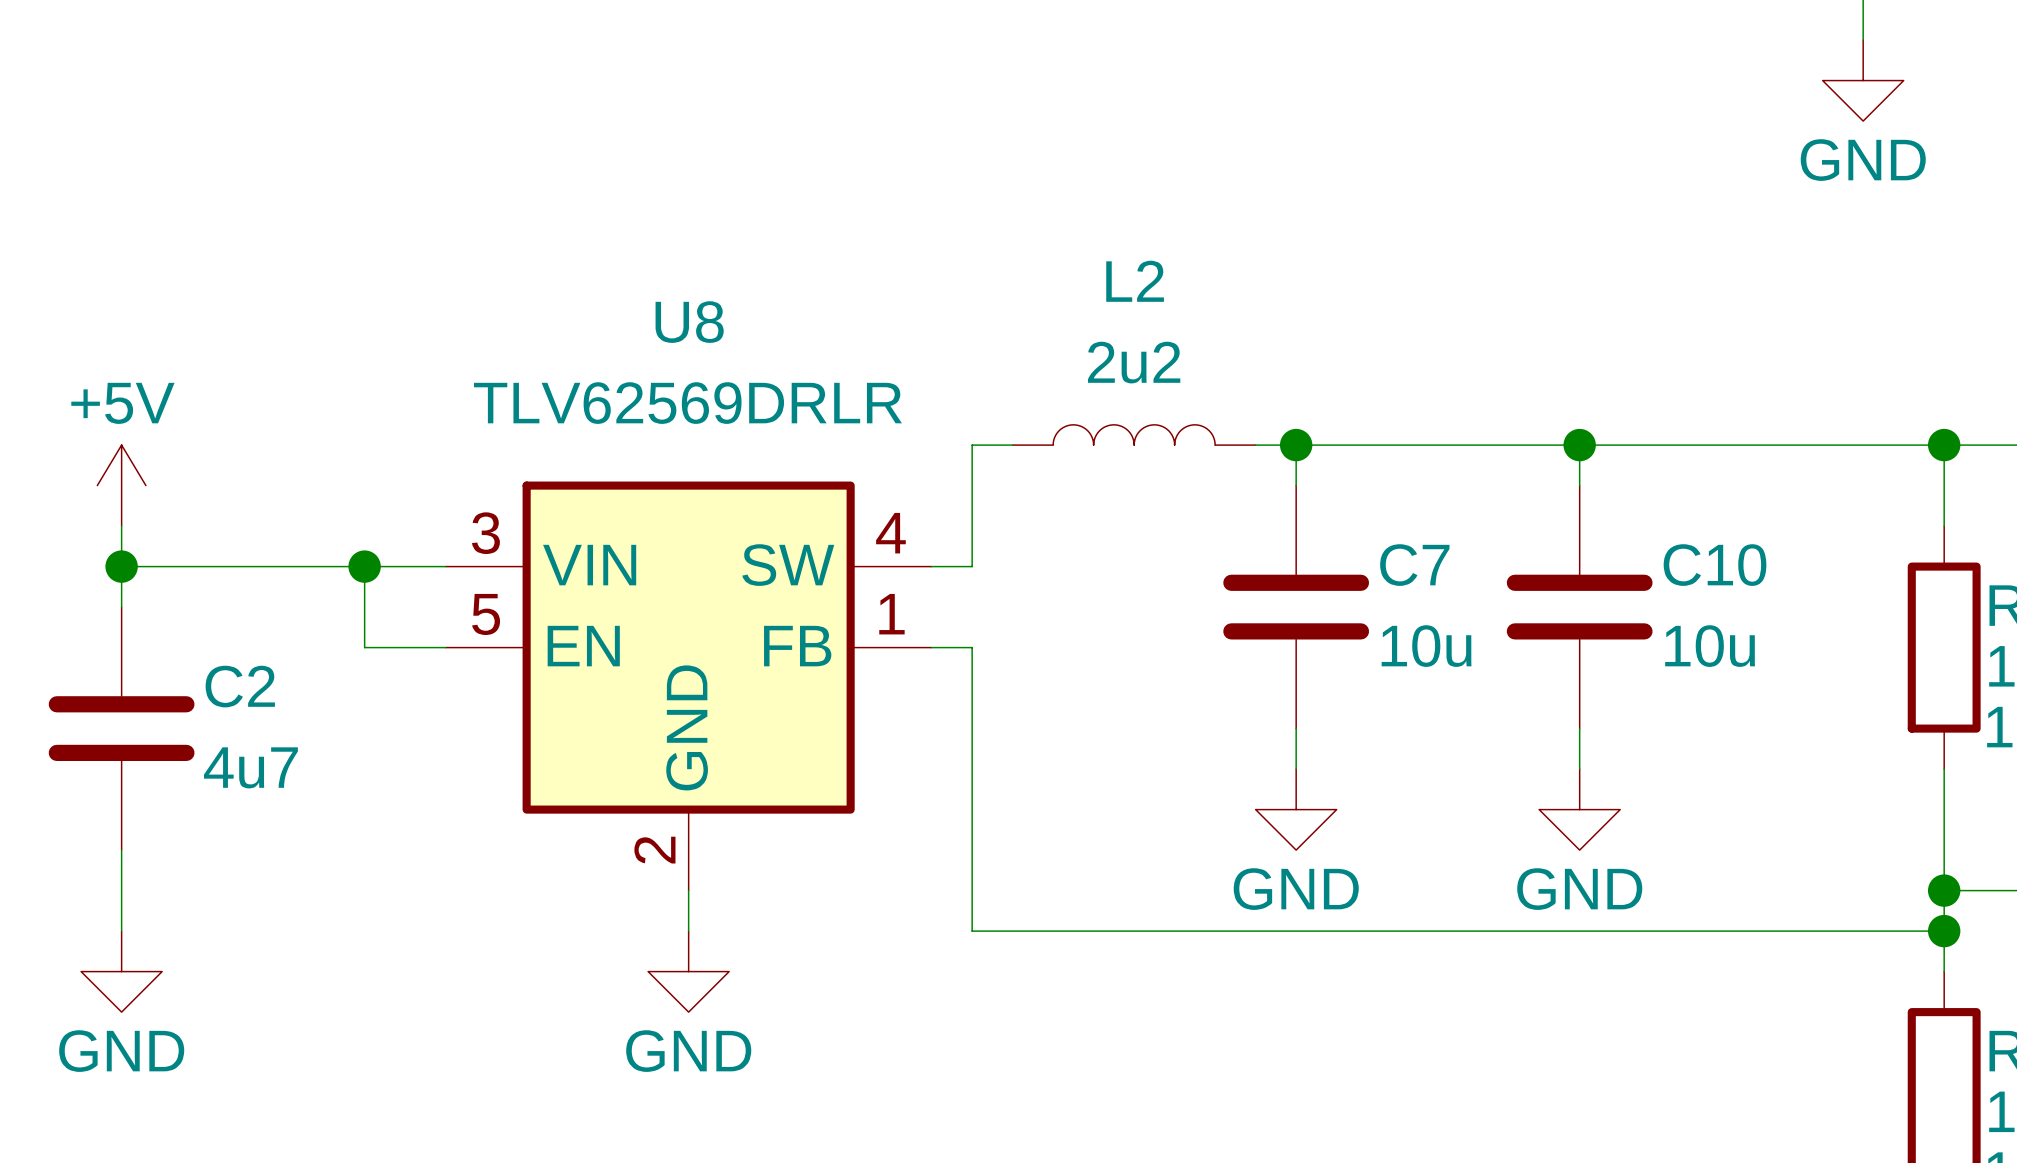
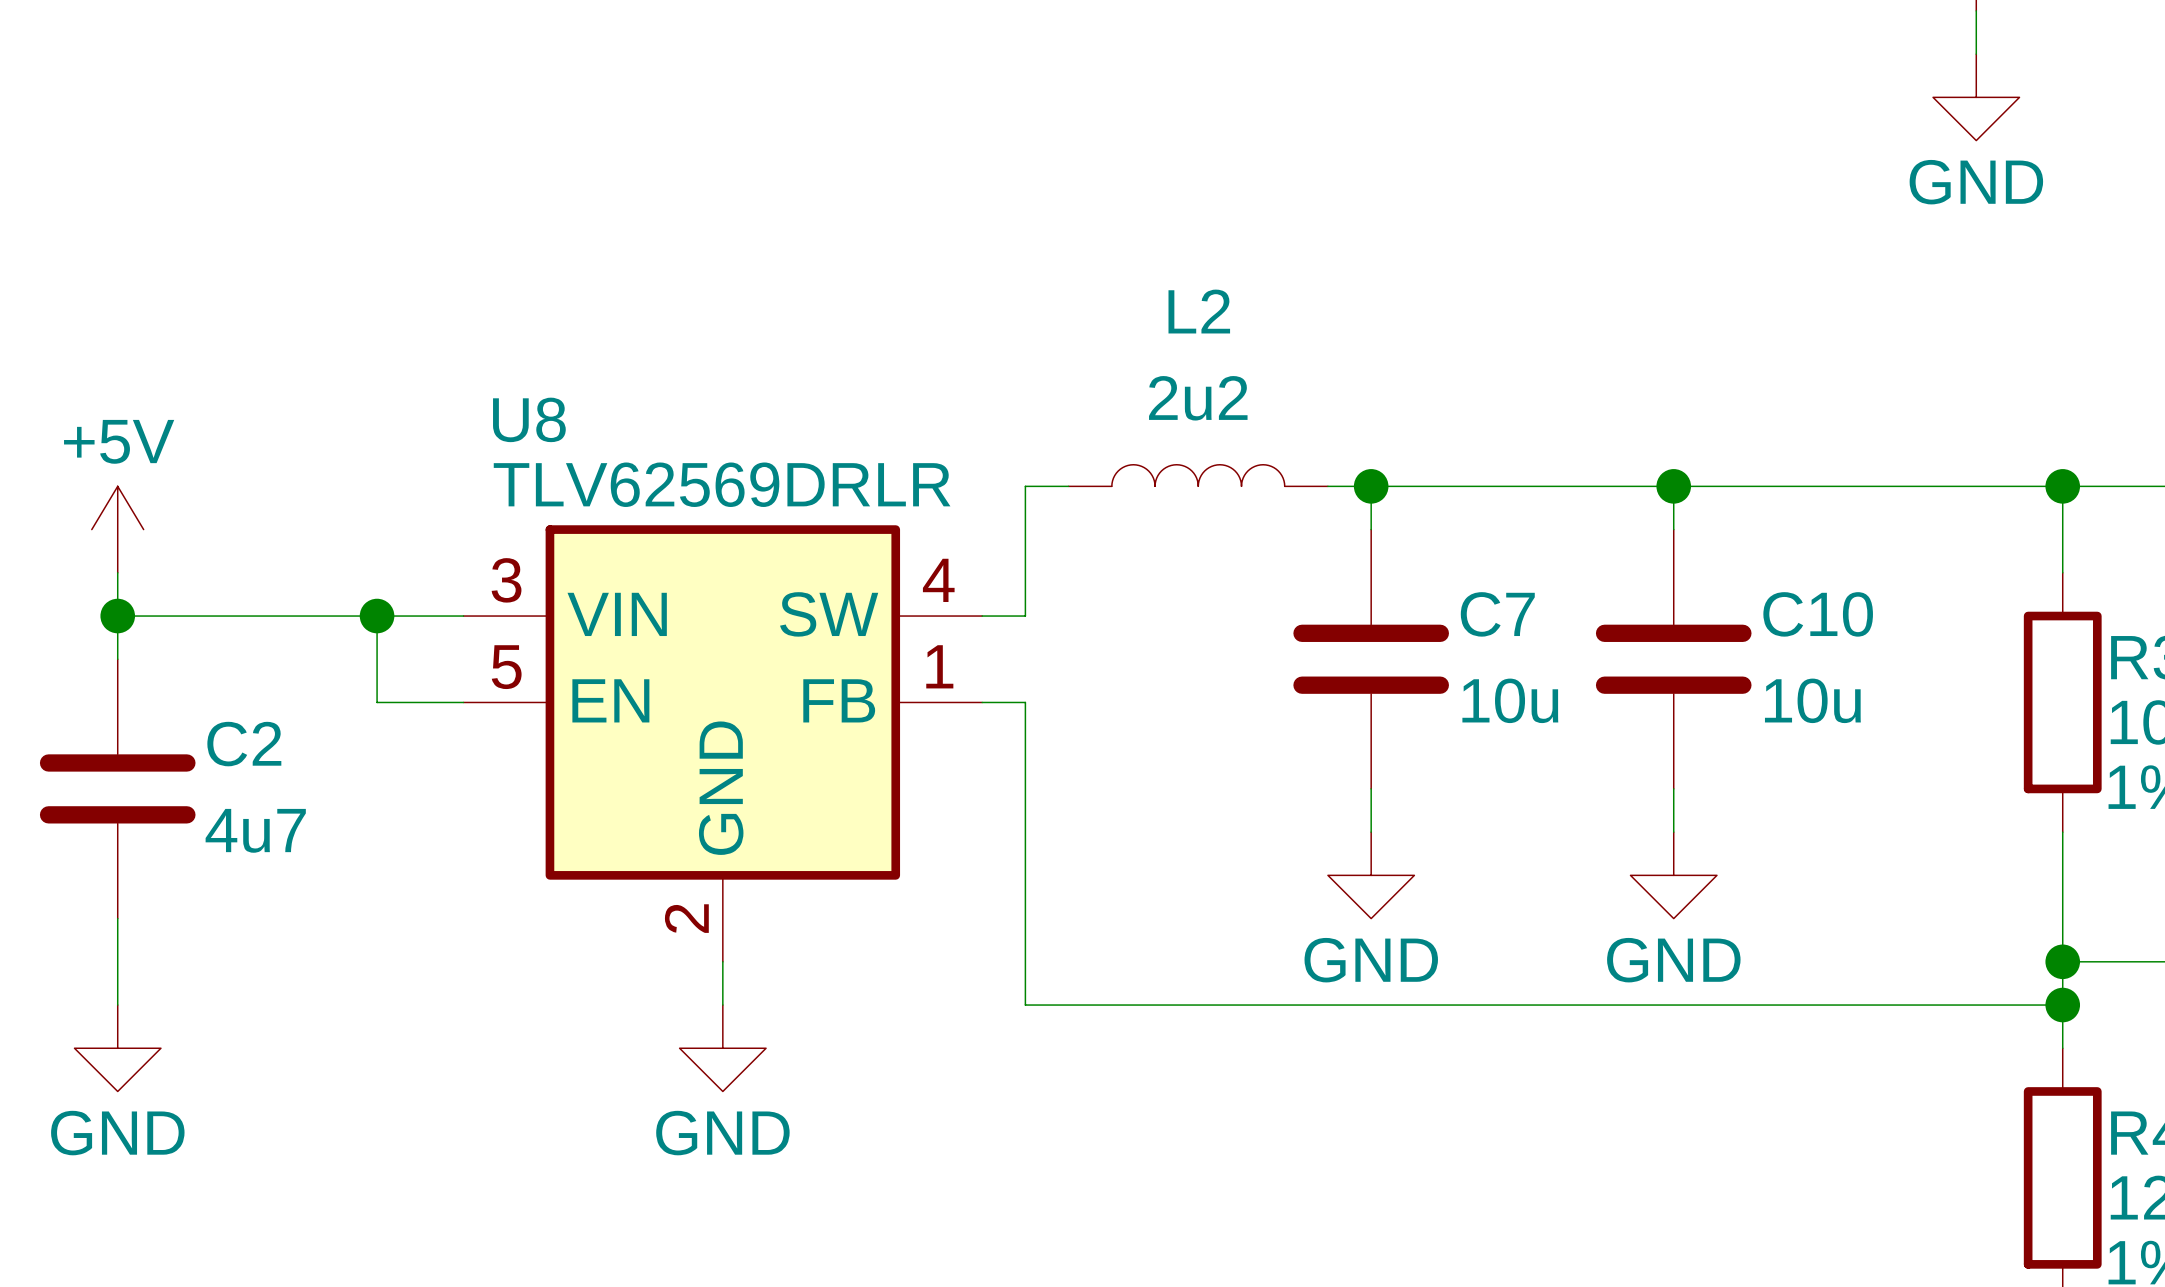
U8 name position: U8 (689, 322) -> U8 (529, 419)
U8 value position: TLV62569DRLR (687, 403) -> TLV62569DRLR (722, 484)

